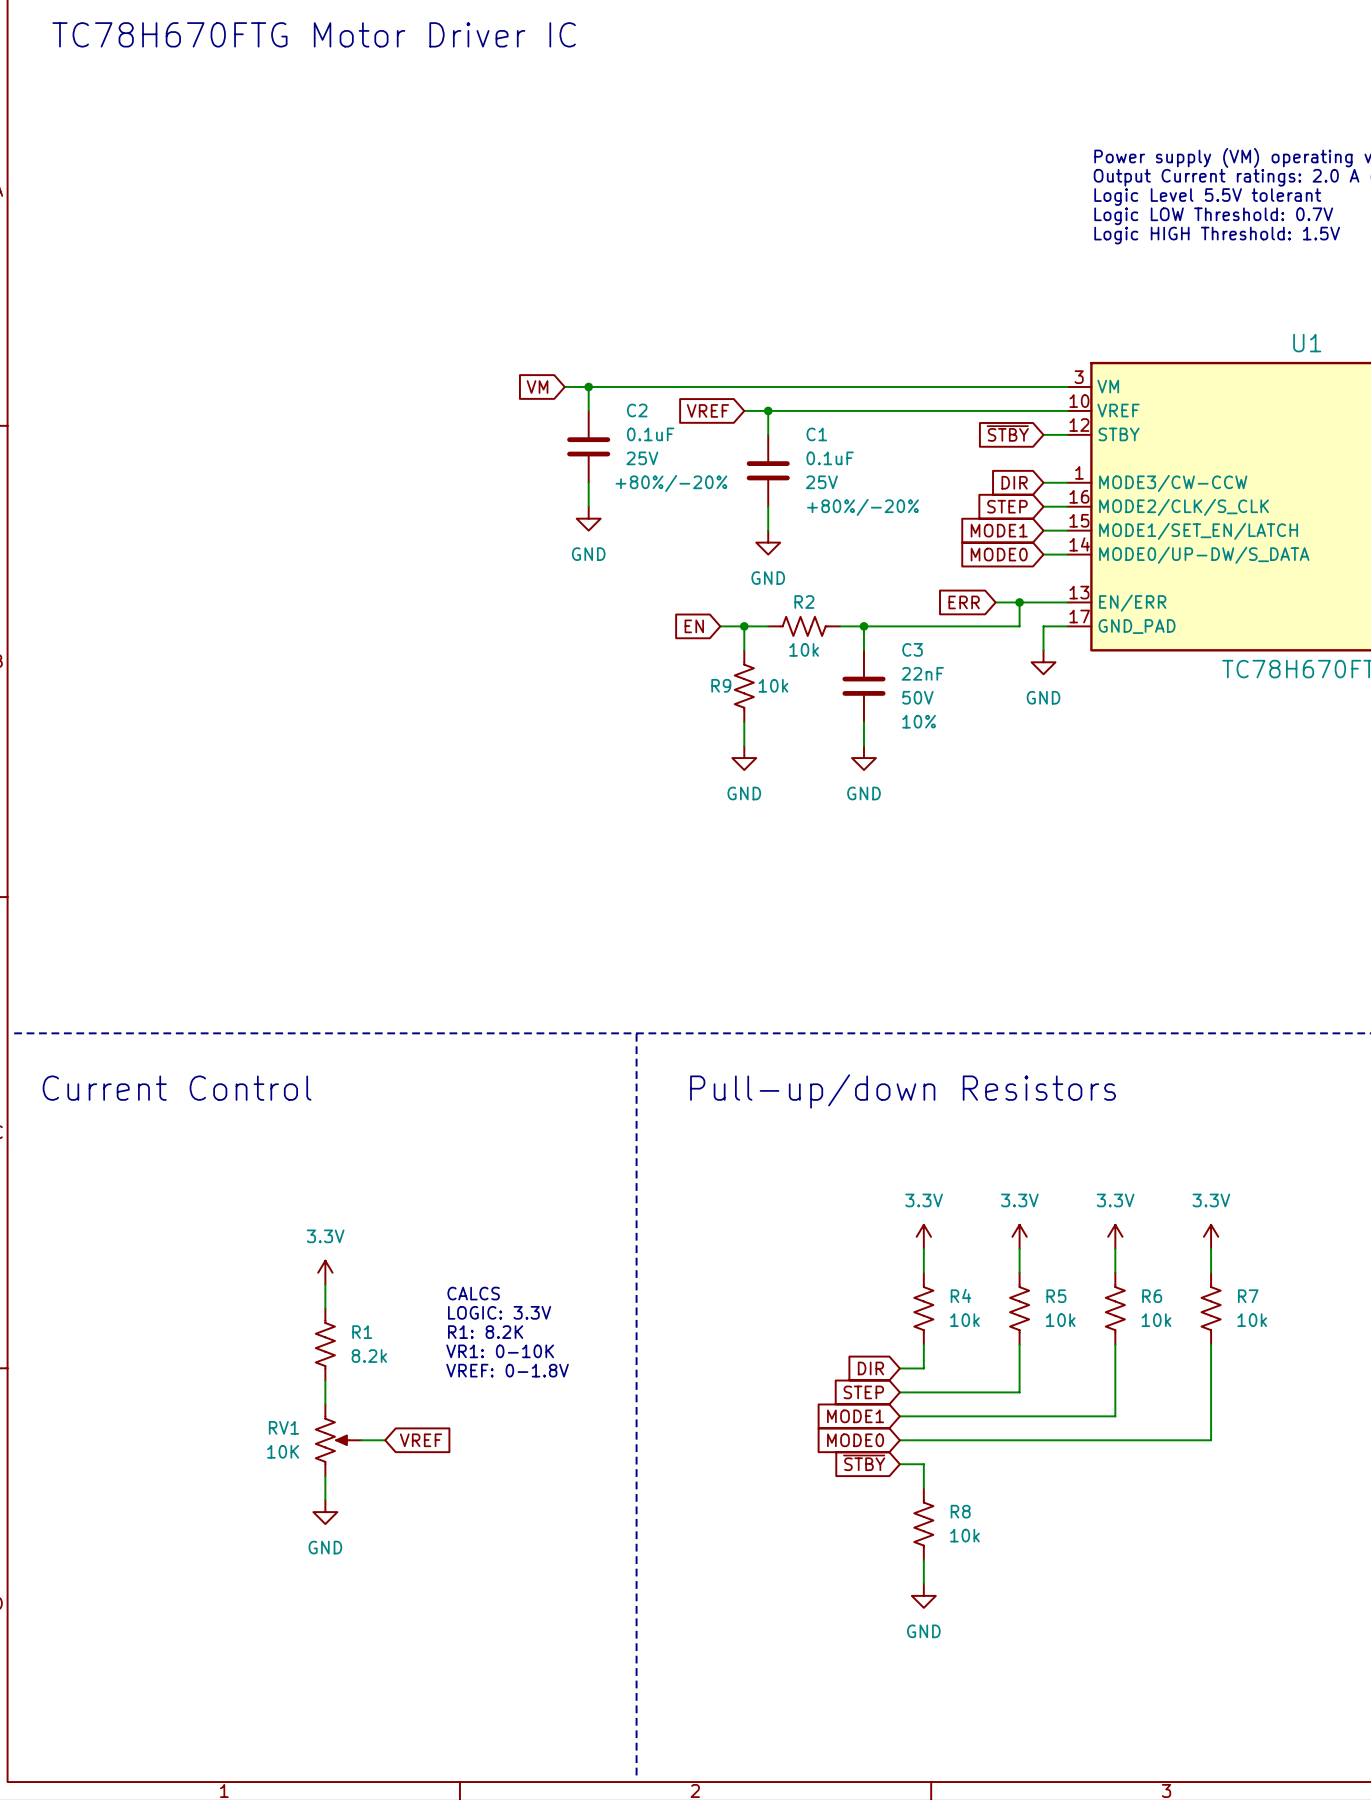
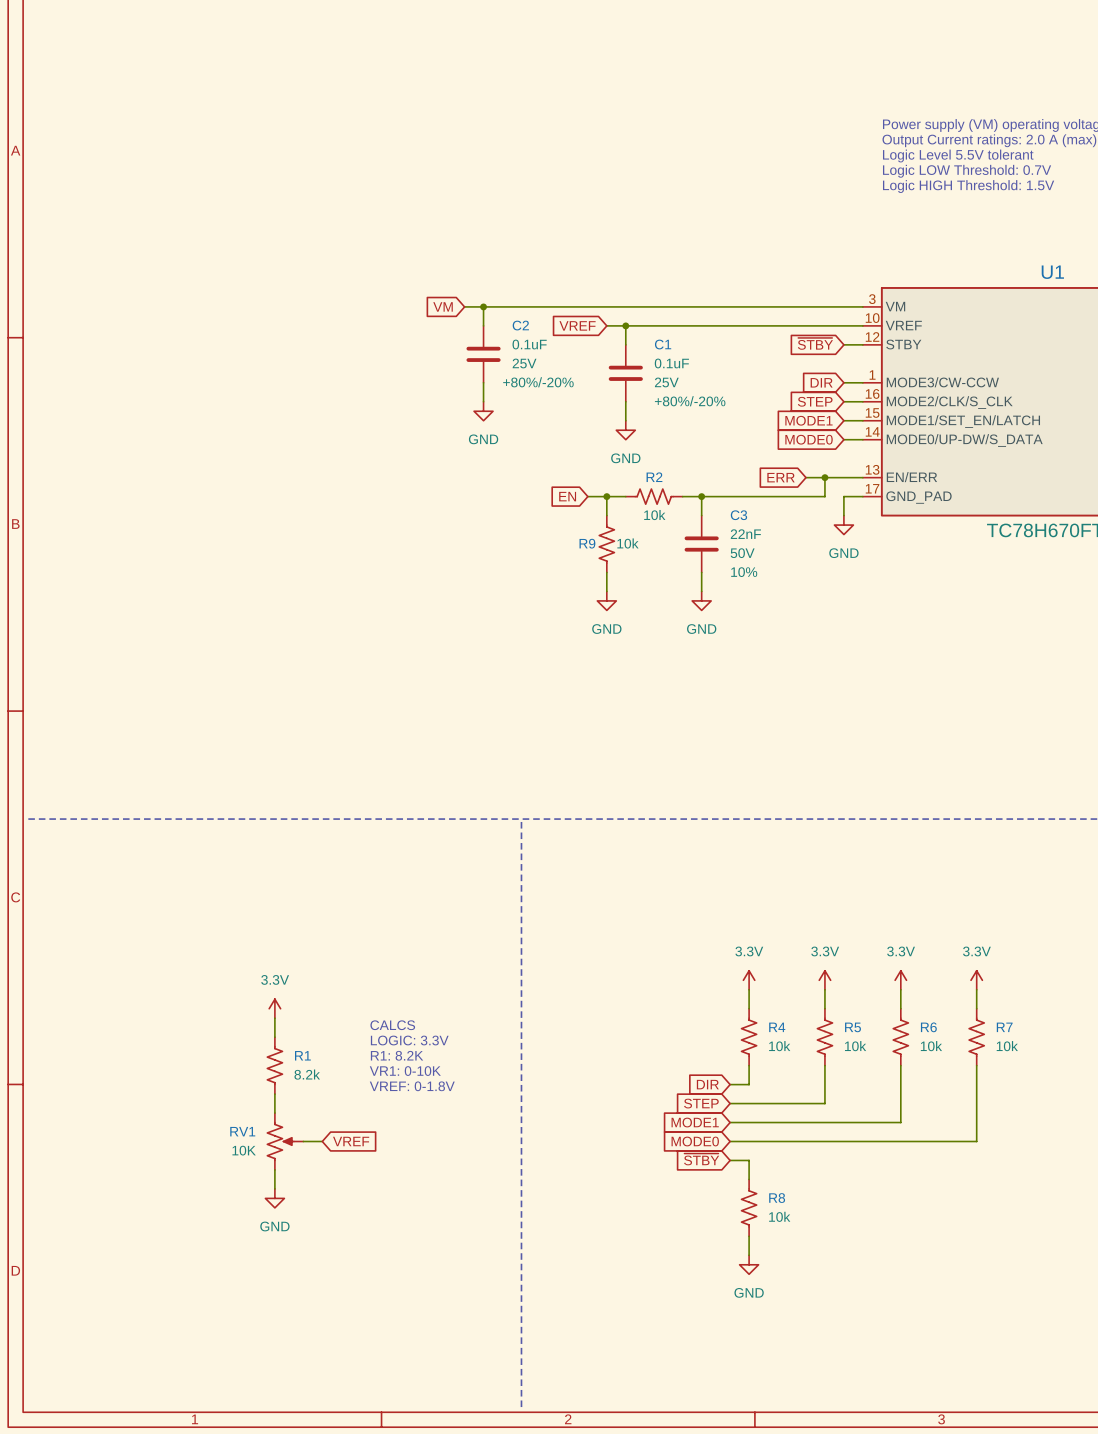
text: TC78H670FTG Motor Driver IC (314, 34) -> none
text: Current Control (177, 1088) -> none
text: Pull-up/down Resistors (903, 1091) -> none

